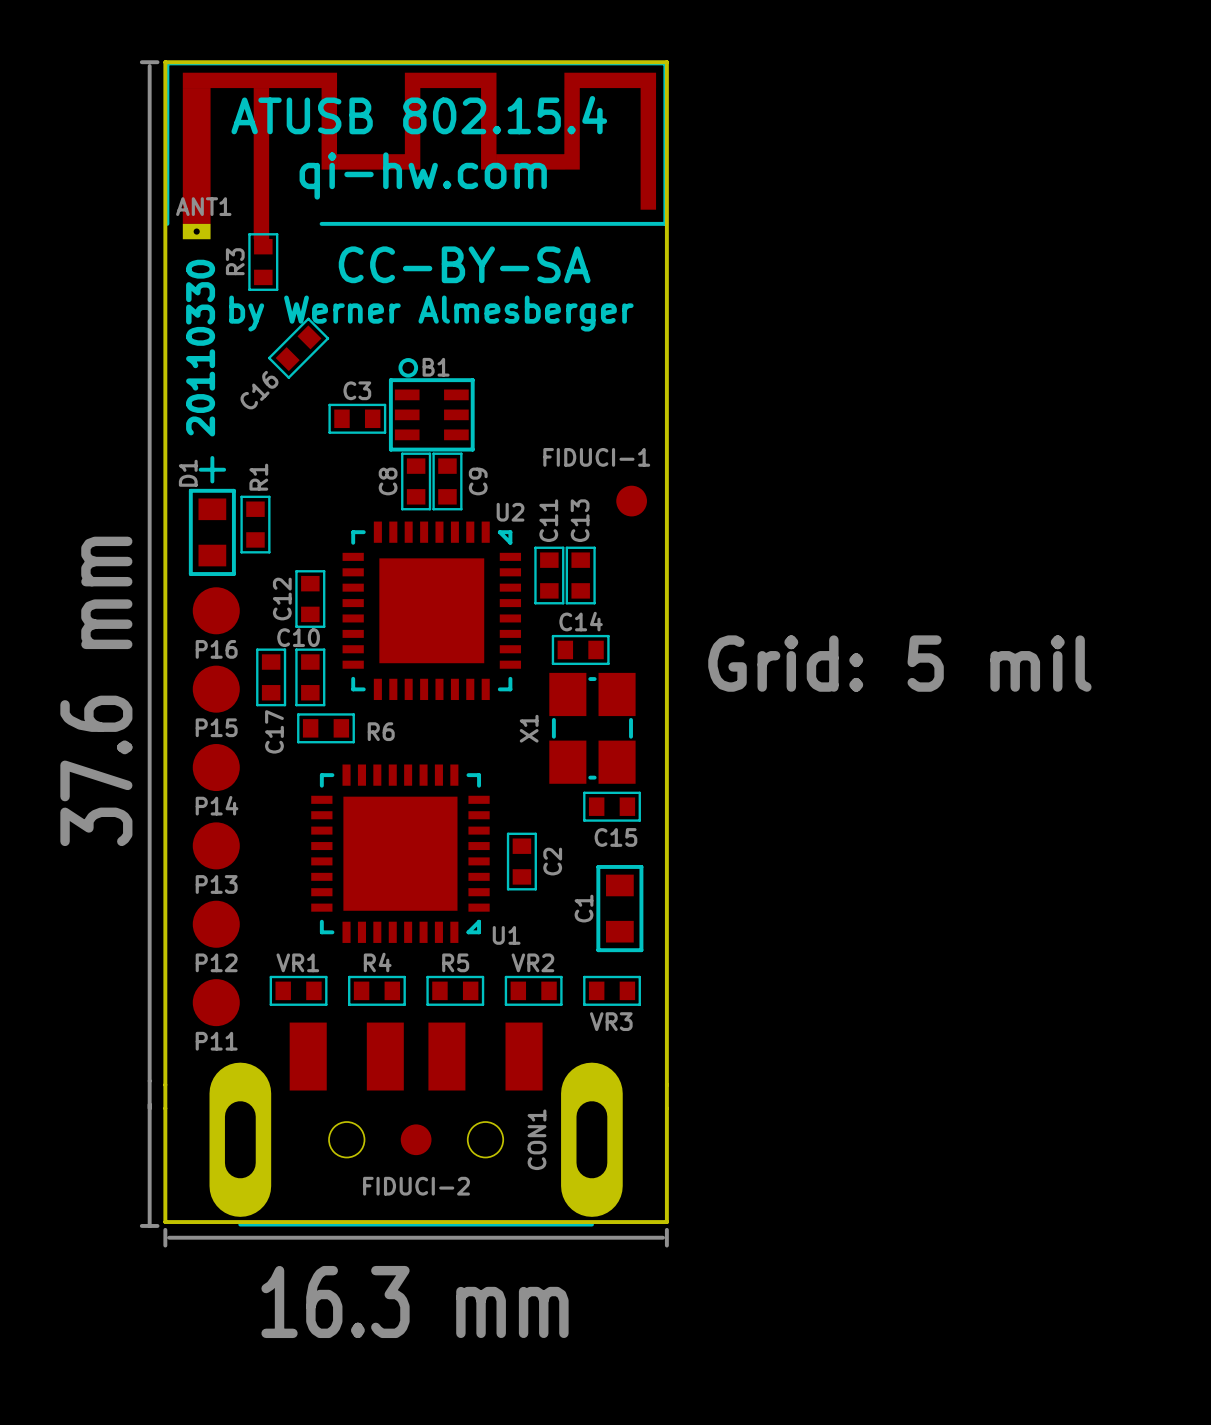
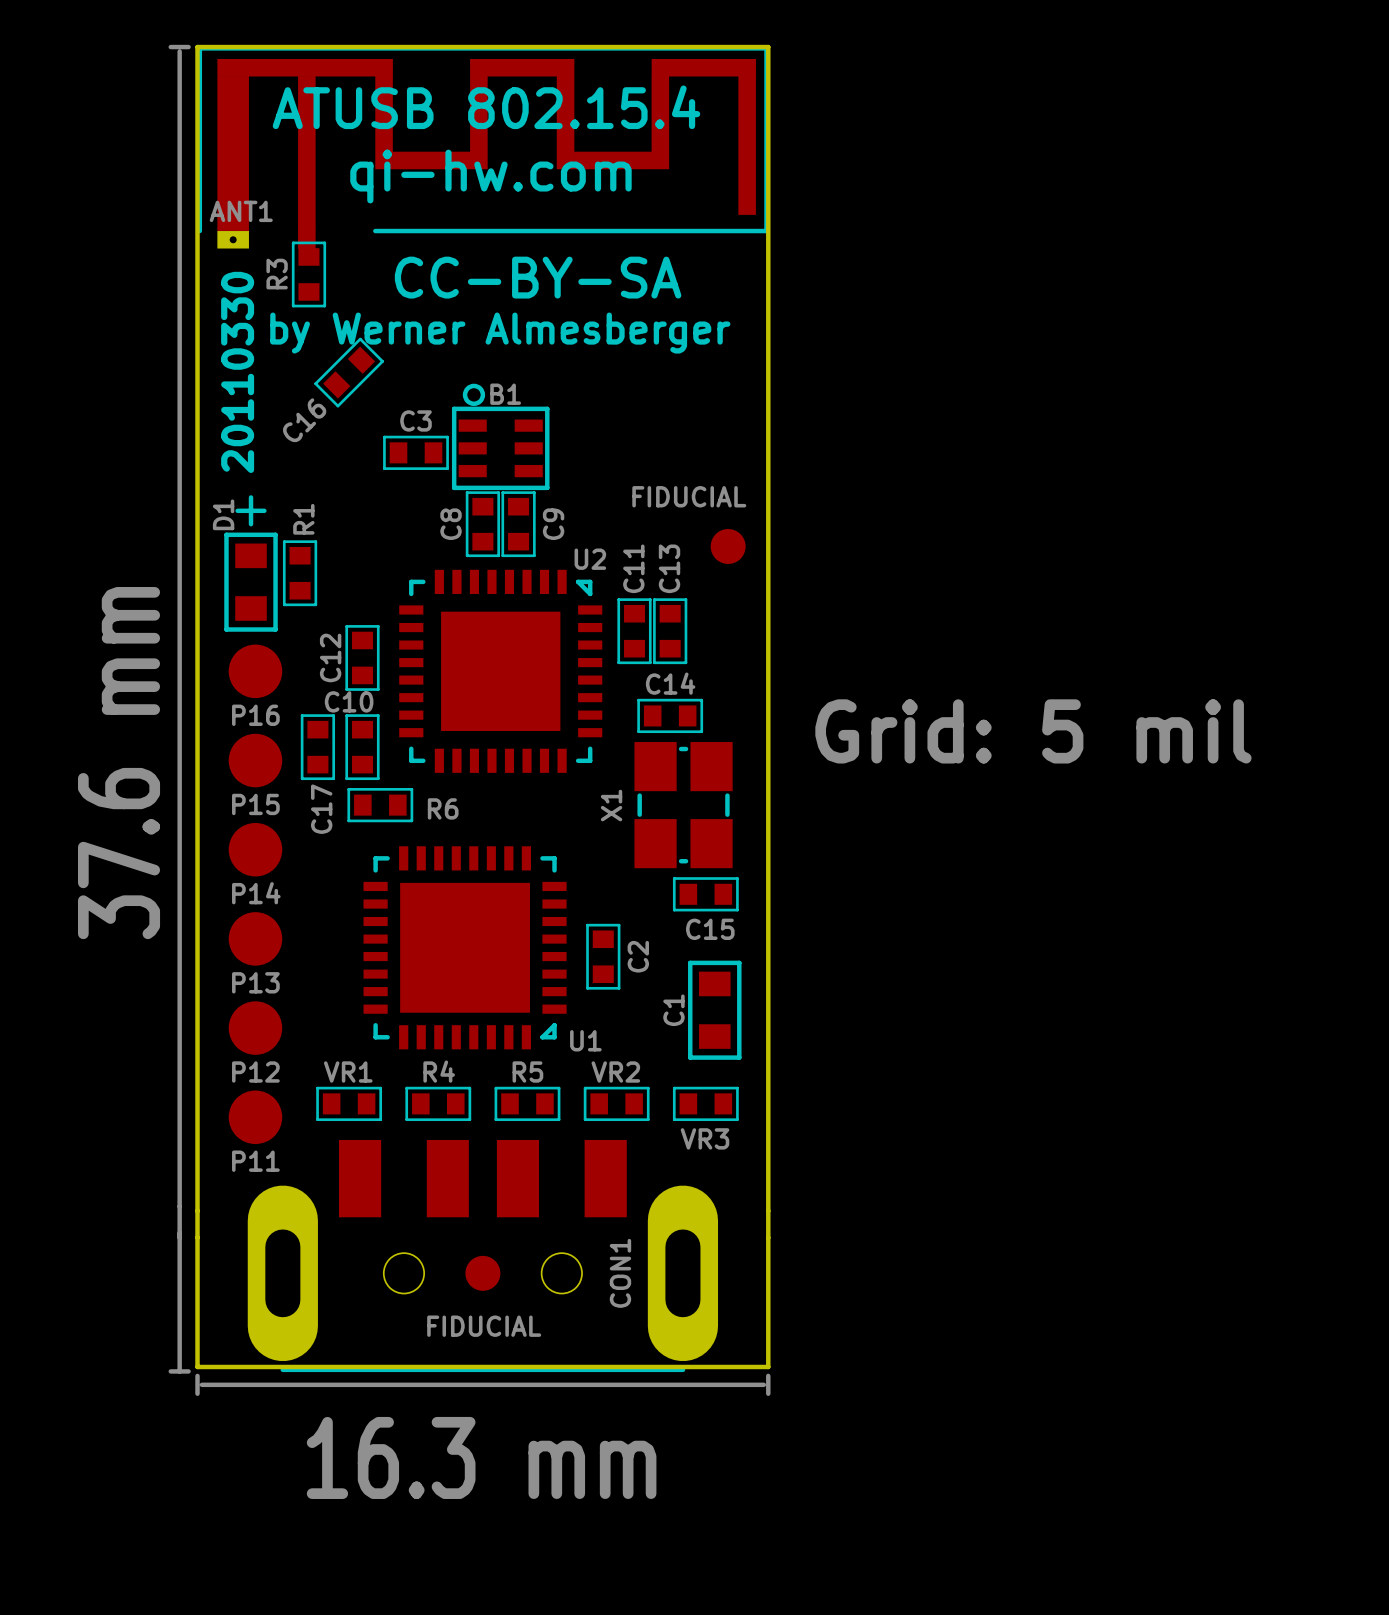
FIDUCI-1 name: FIDUCI-1 (596, 457) -> FIDUCIAL (689, 496)
FIDUCI-2 name: FIDUCI-2 (416, 1186) -> FIDUCIAL (484, 1326)

